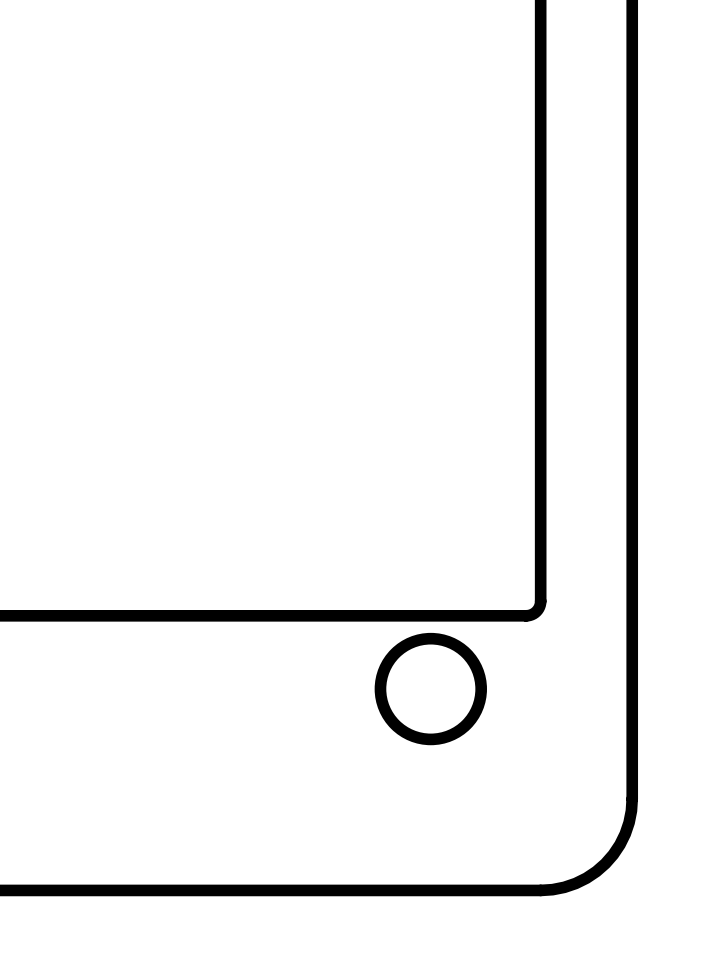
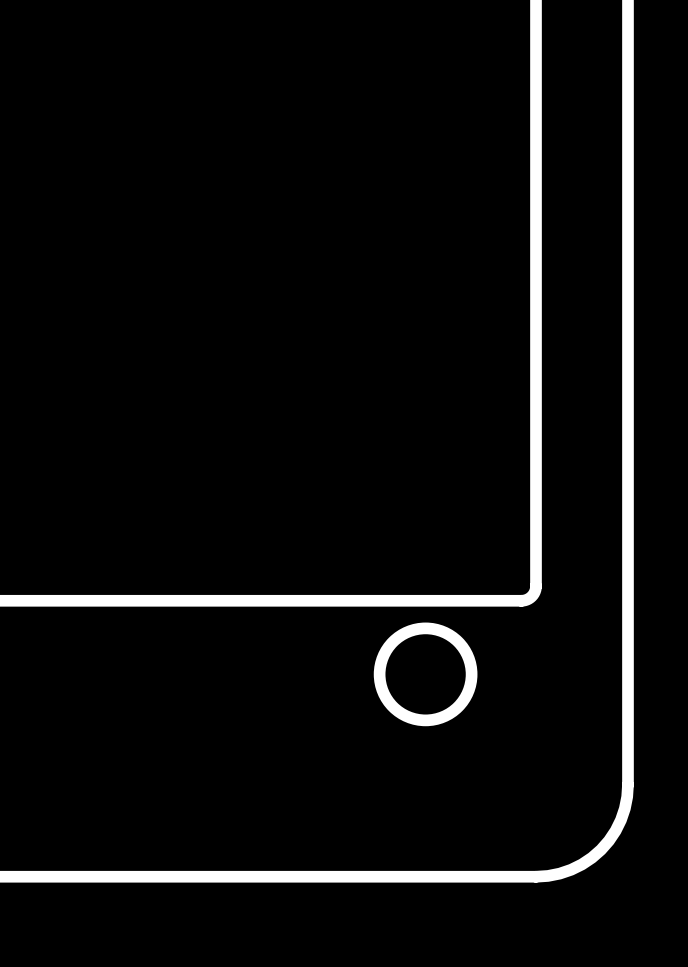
round board edge: [374, 632, 487, 746] -> none
round board edge: none -> [373, 622, 478, 727]

